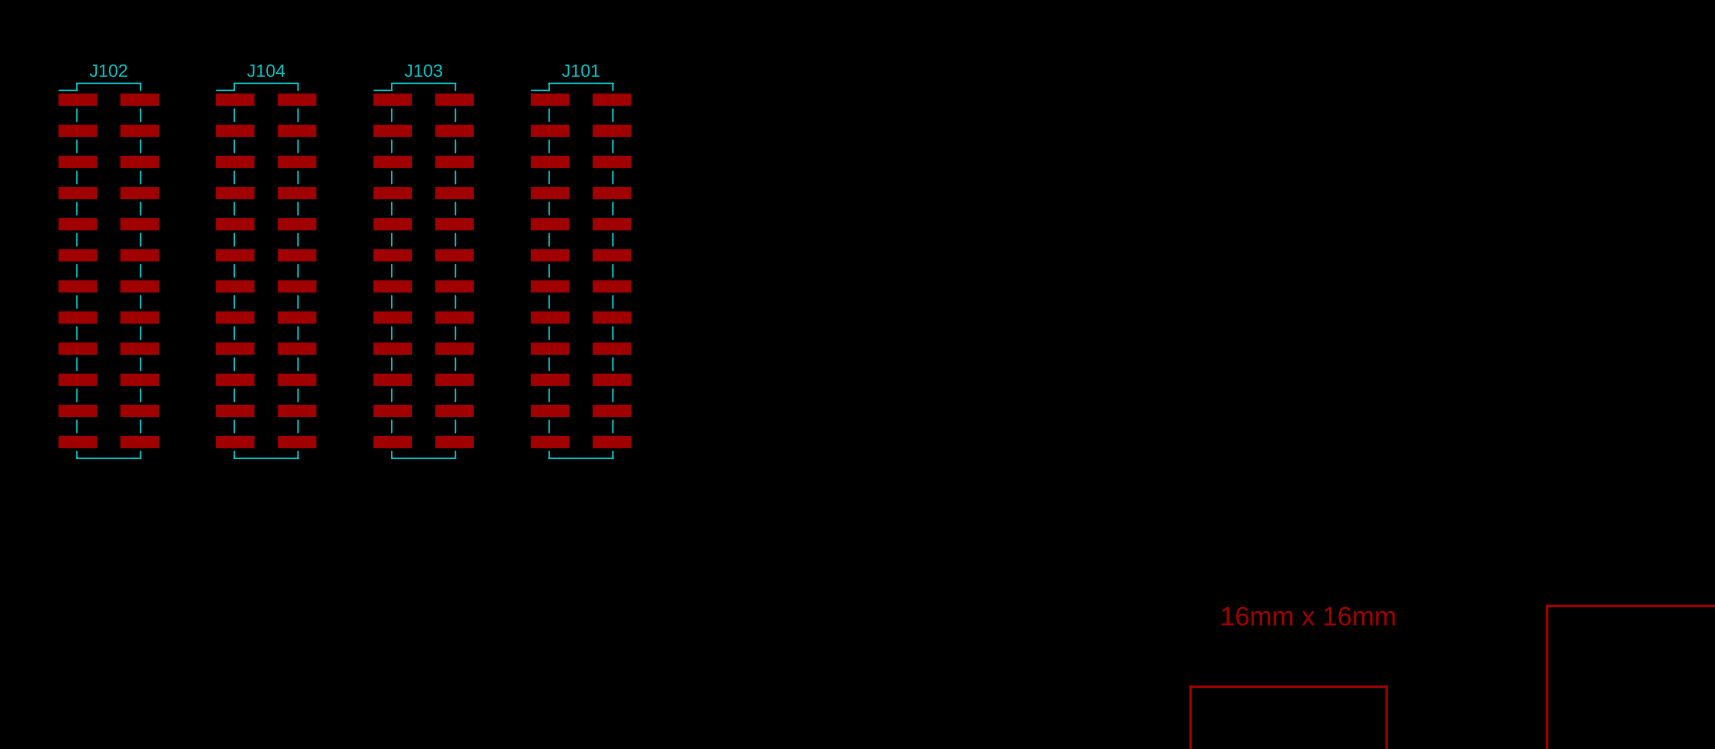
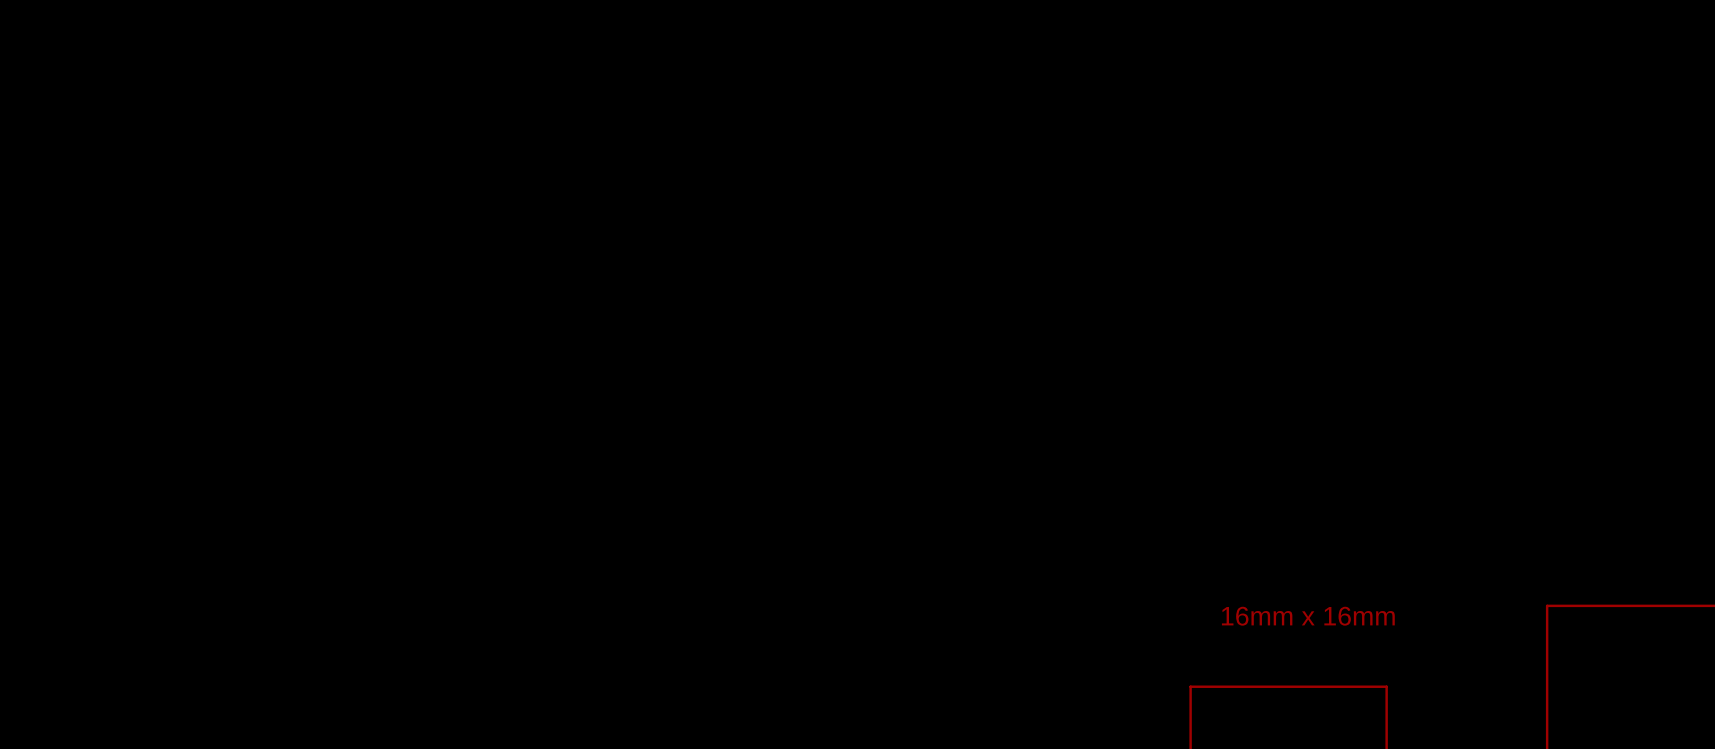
J102: (108, 270) -> none
J104: (266, 270) -> none
J103: (423, 270) -> none
J101: (581, 270) -> none

